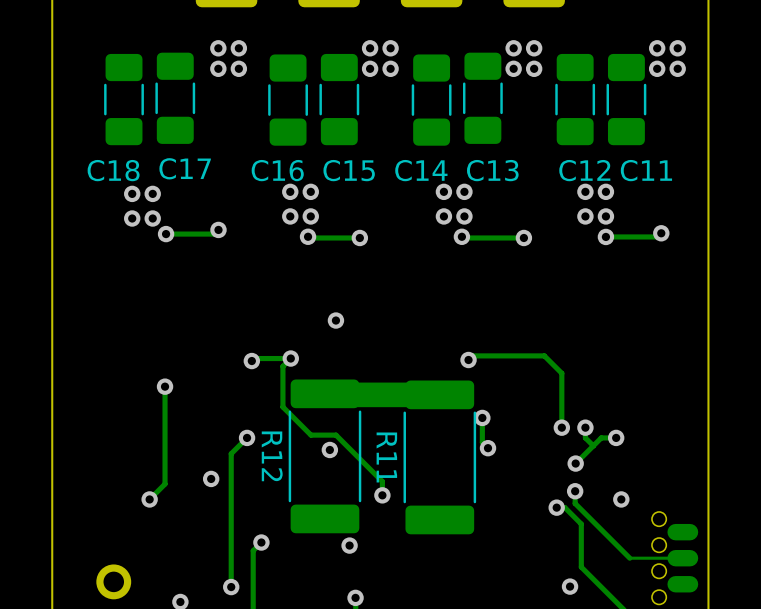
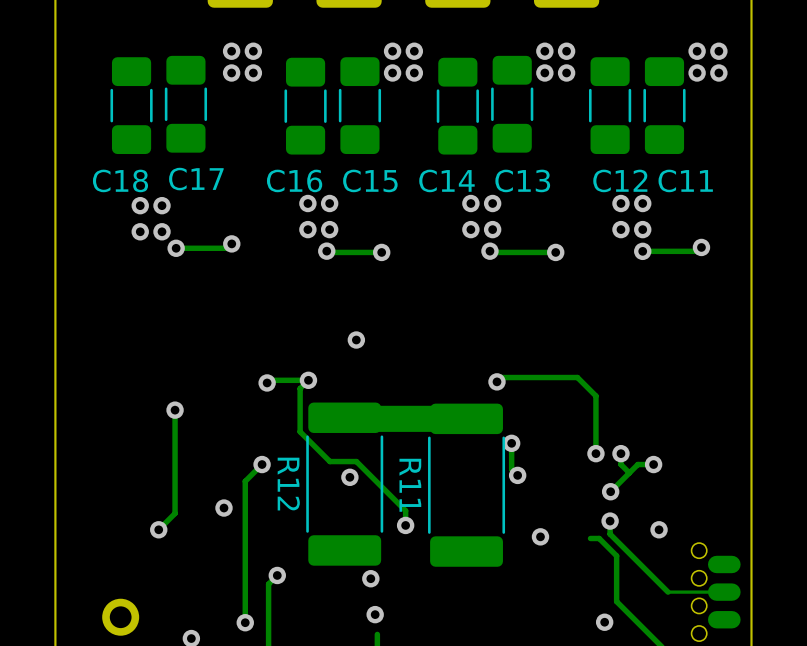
via position: (556, 507) -> (540, 536)
via position: (355, 597) -> (375, 614)

